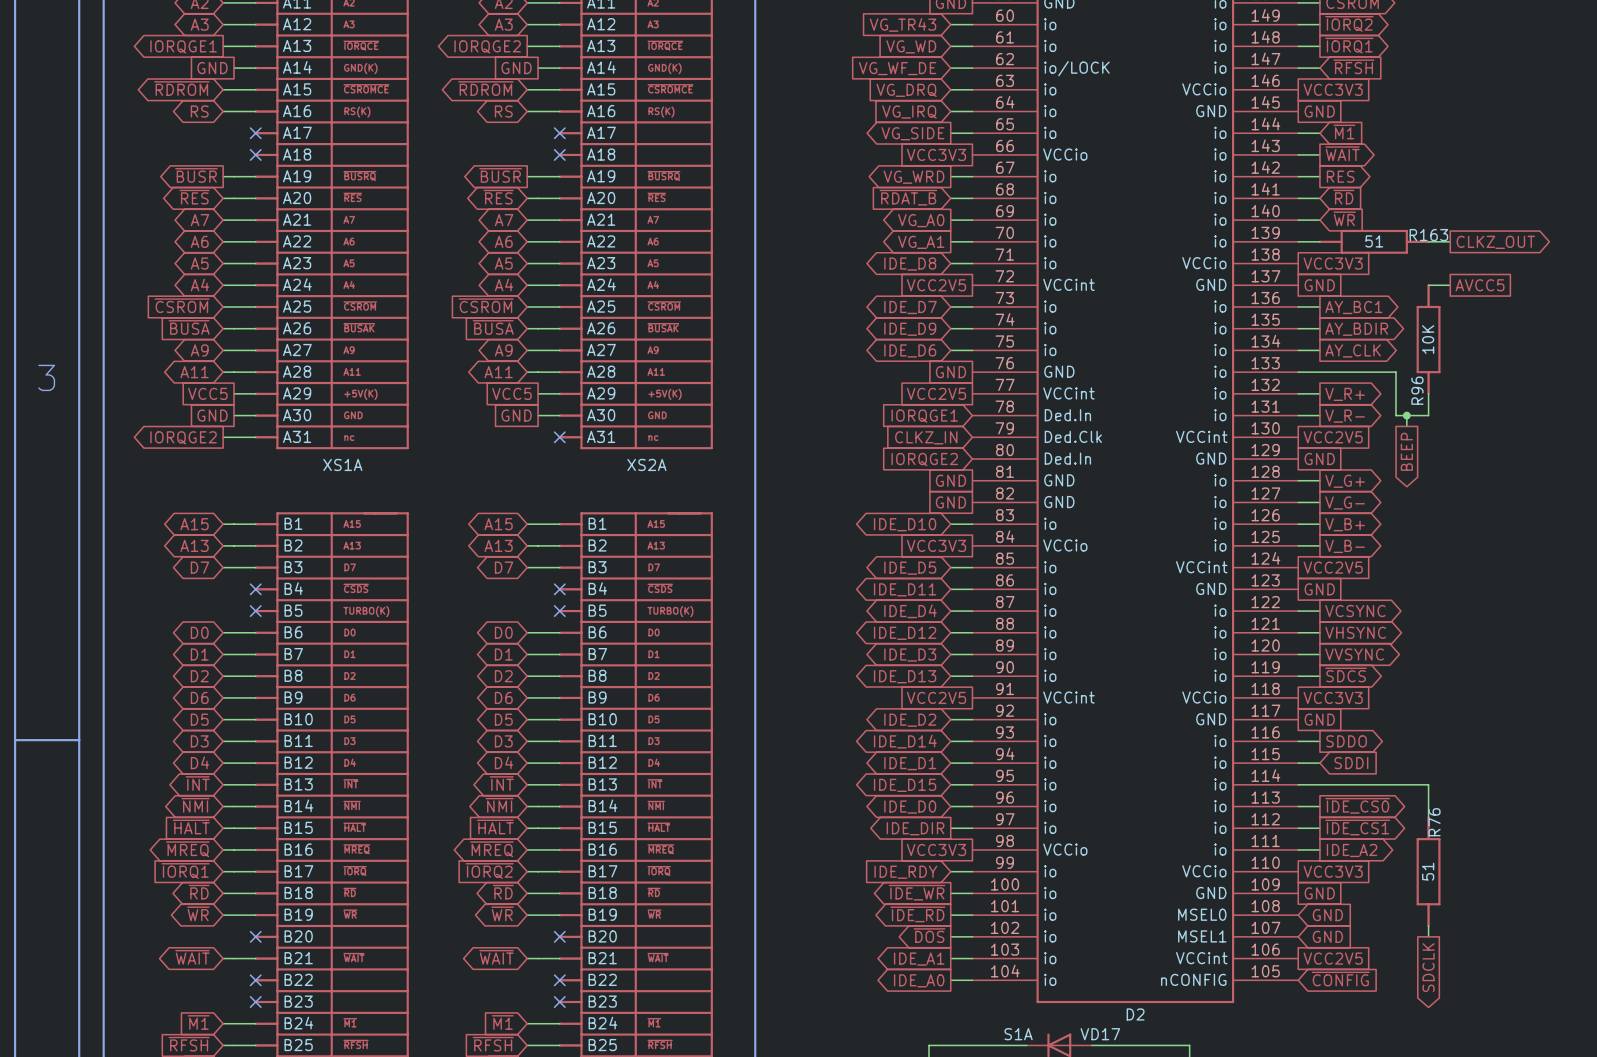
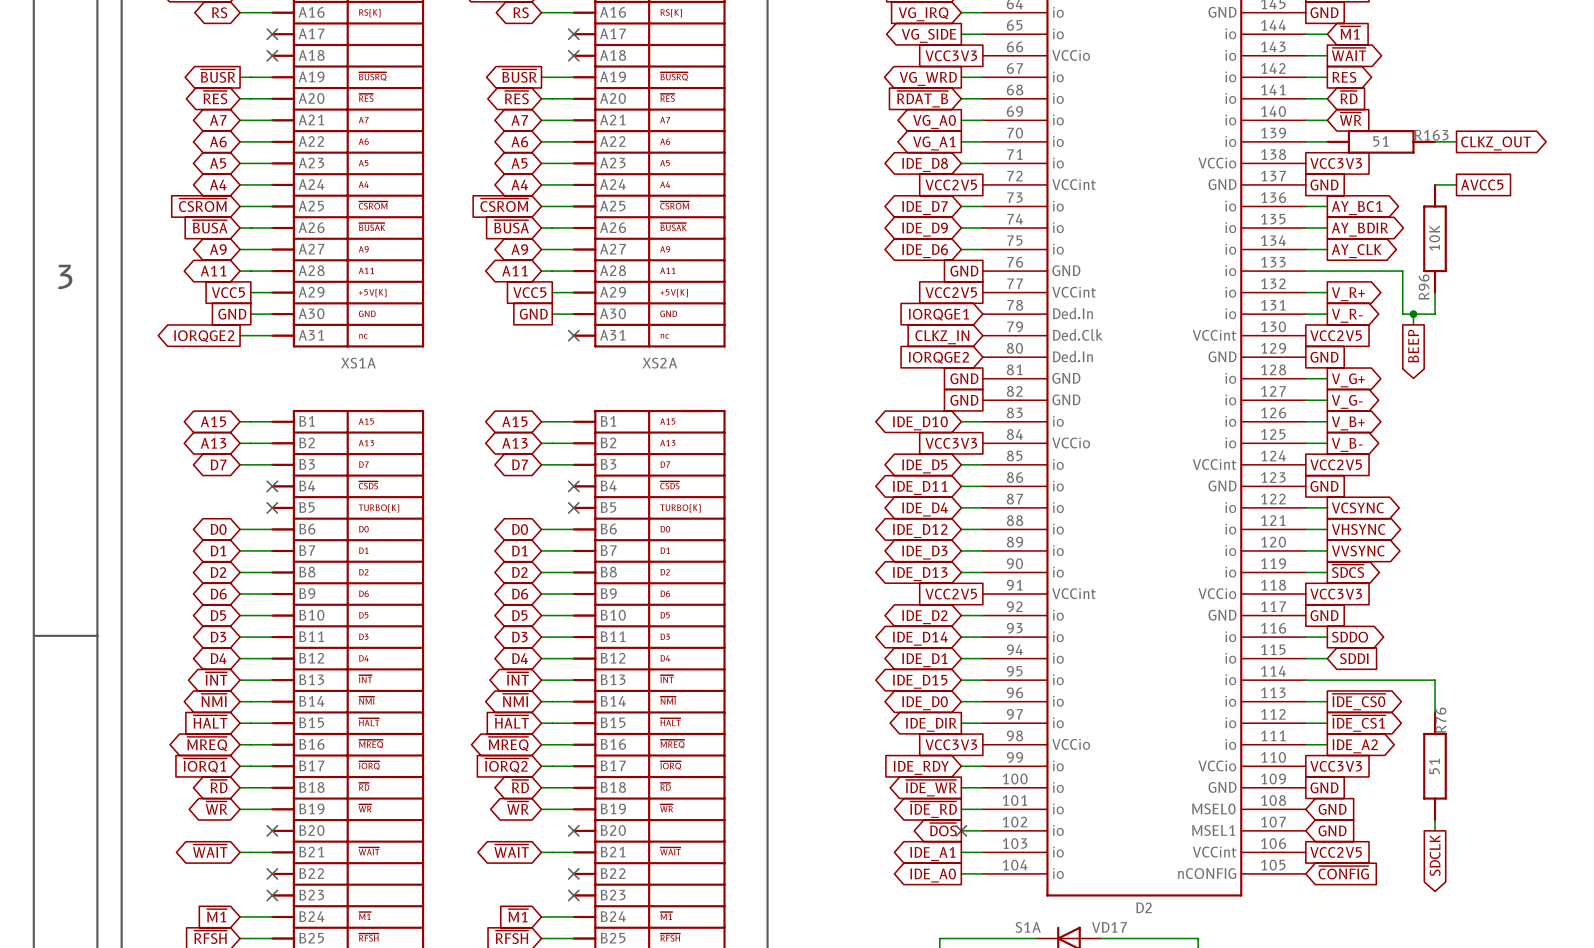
no-connect mark: none -> (961, 830)

